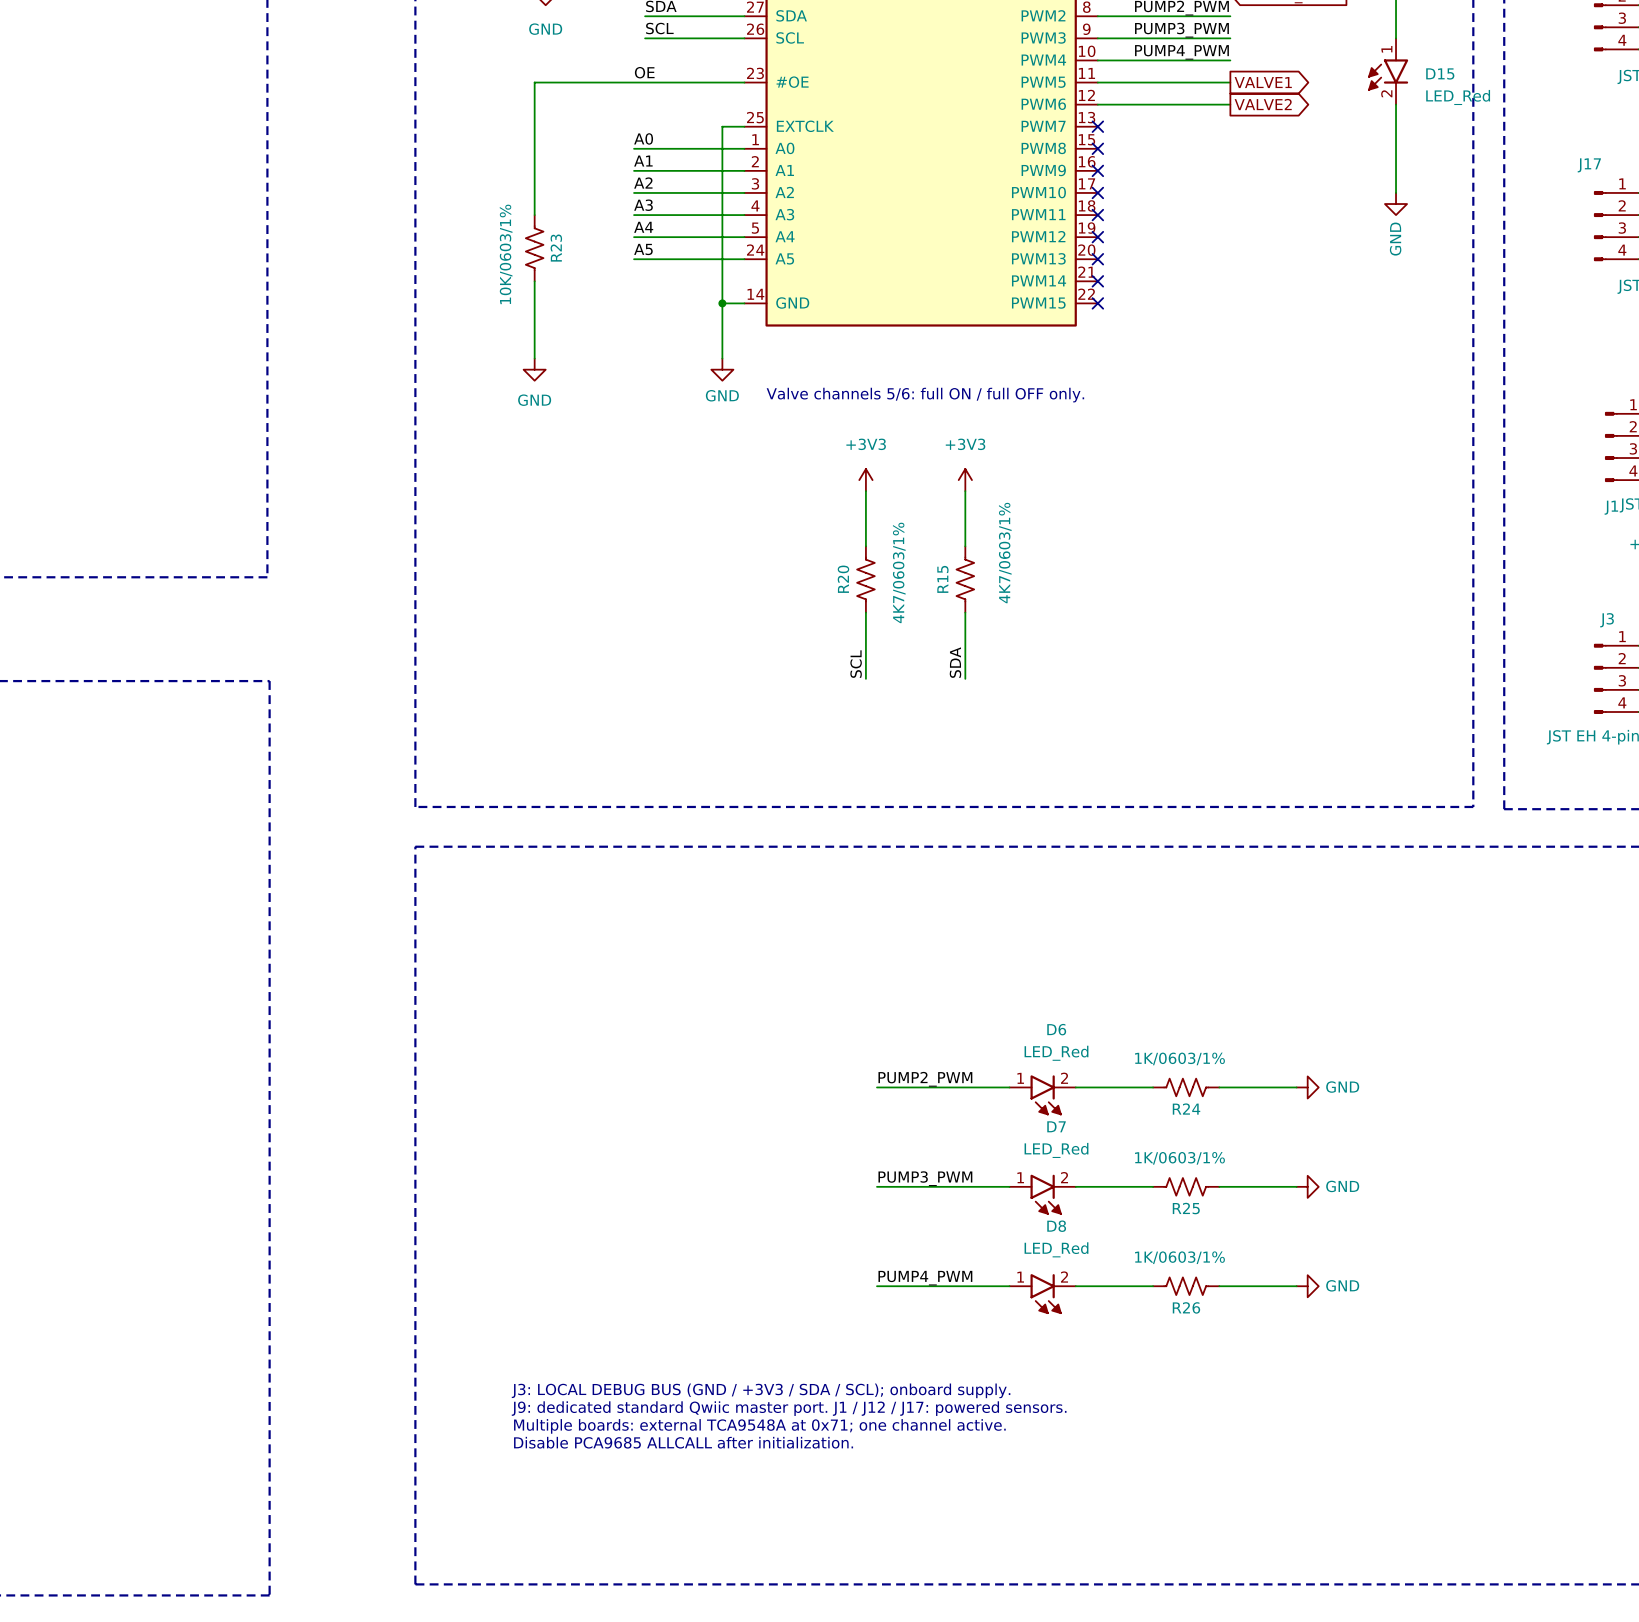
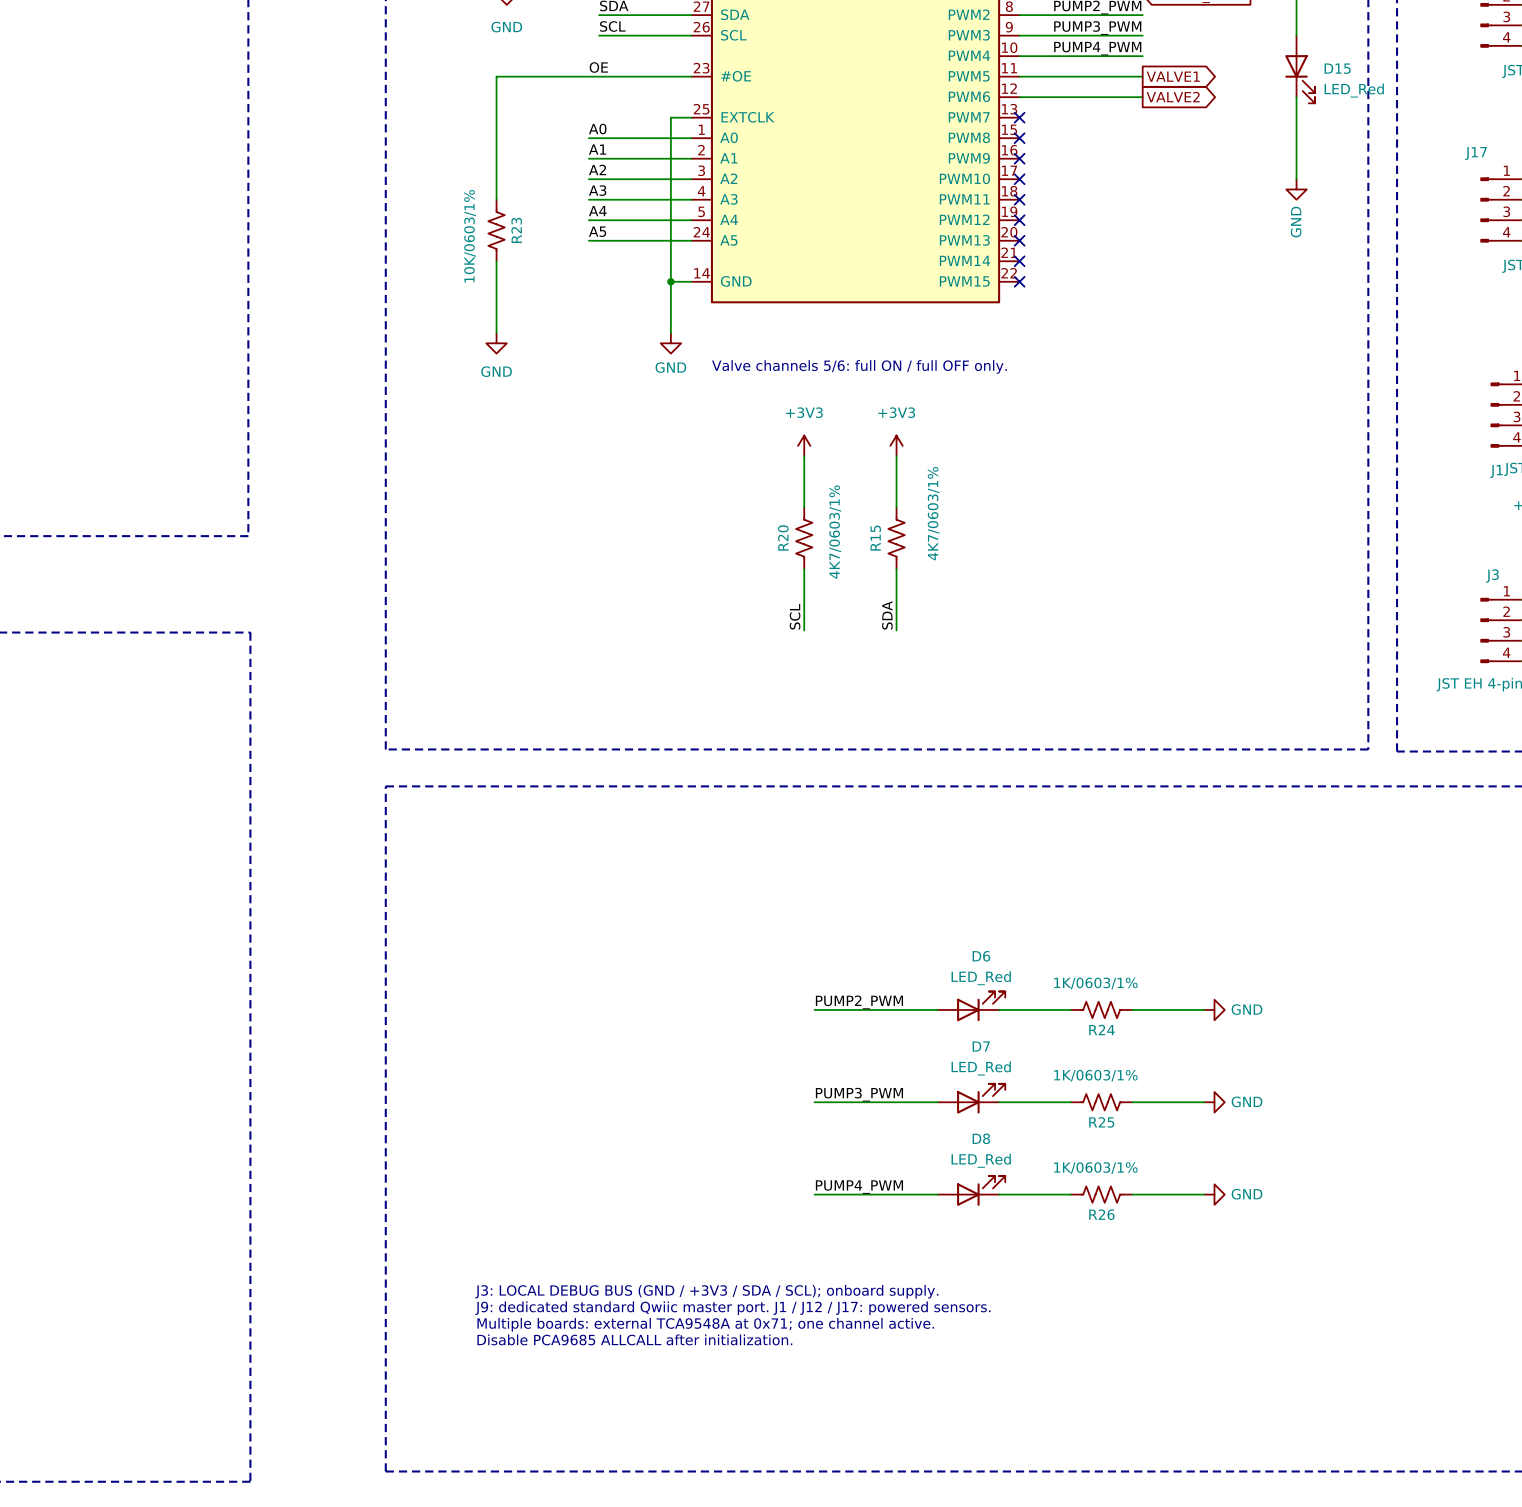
D15 symbol: [1368, 38, 1409, 105] -> [1285, 35, 1315, 104]
D6 symbol: [1009, 1075, 1076, 1116] -> [937, 991, 1006, 1022]
D7 symbol: [1009, 1174, 1076, 1215] -> [937, 1083, 1006, 1114]
D8 symbol: [1009, 1274, 1076, 1314] -> [937, 1176, 1006, 1206]

